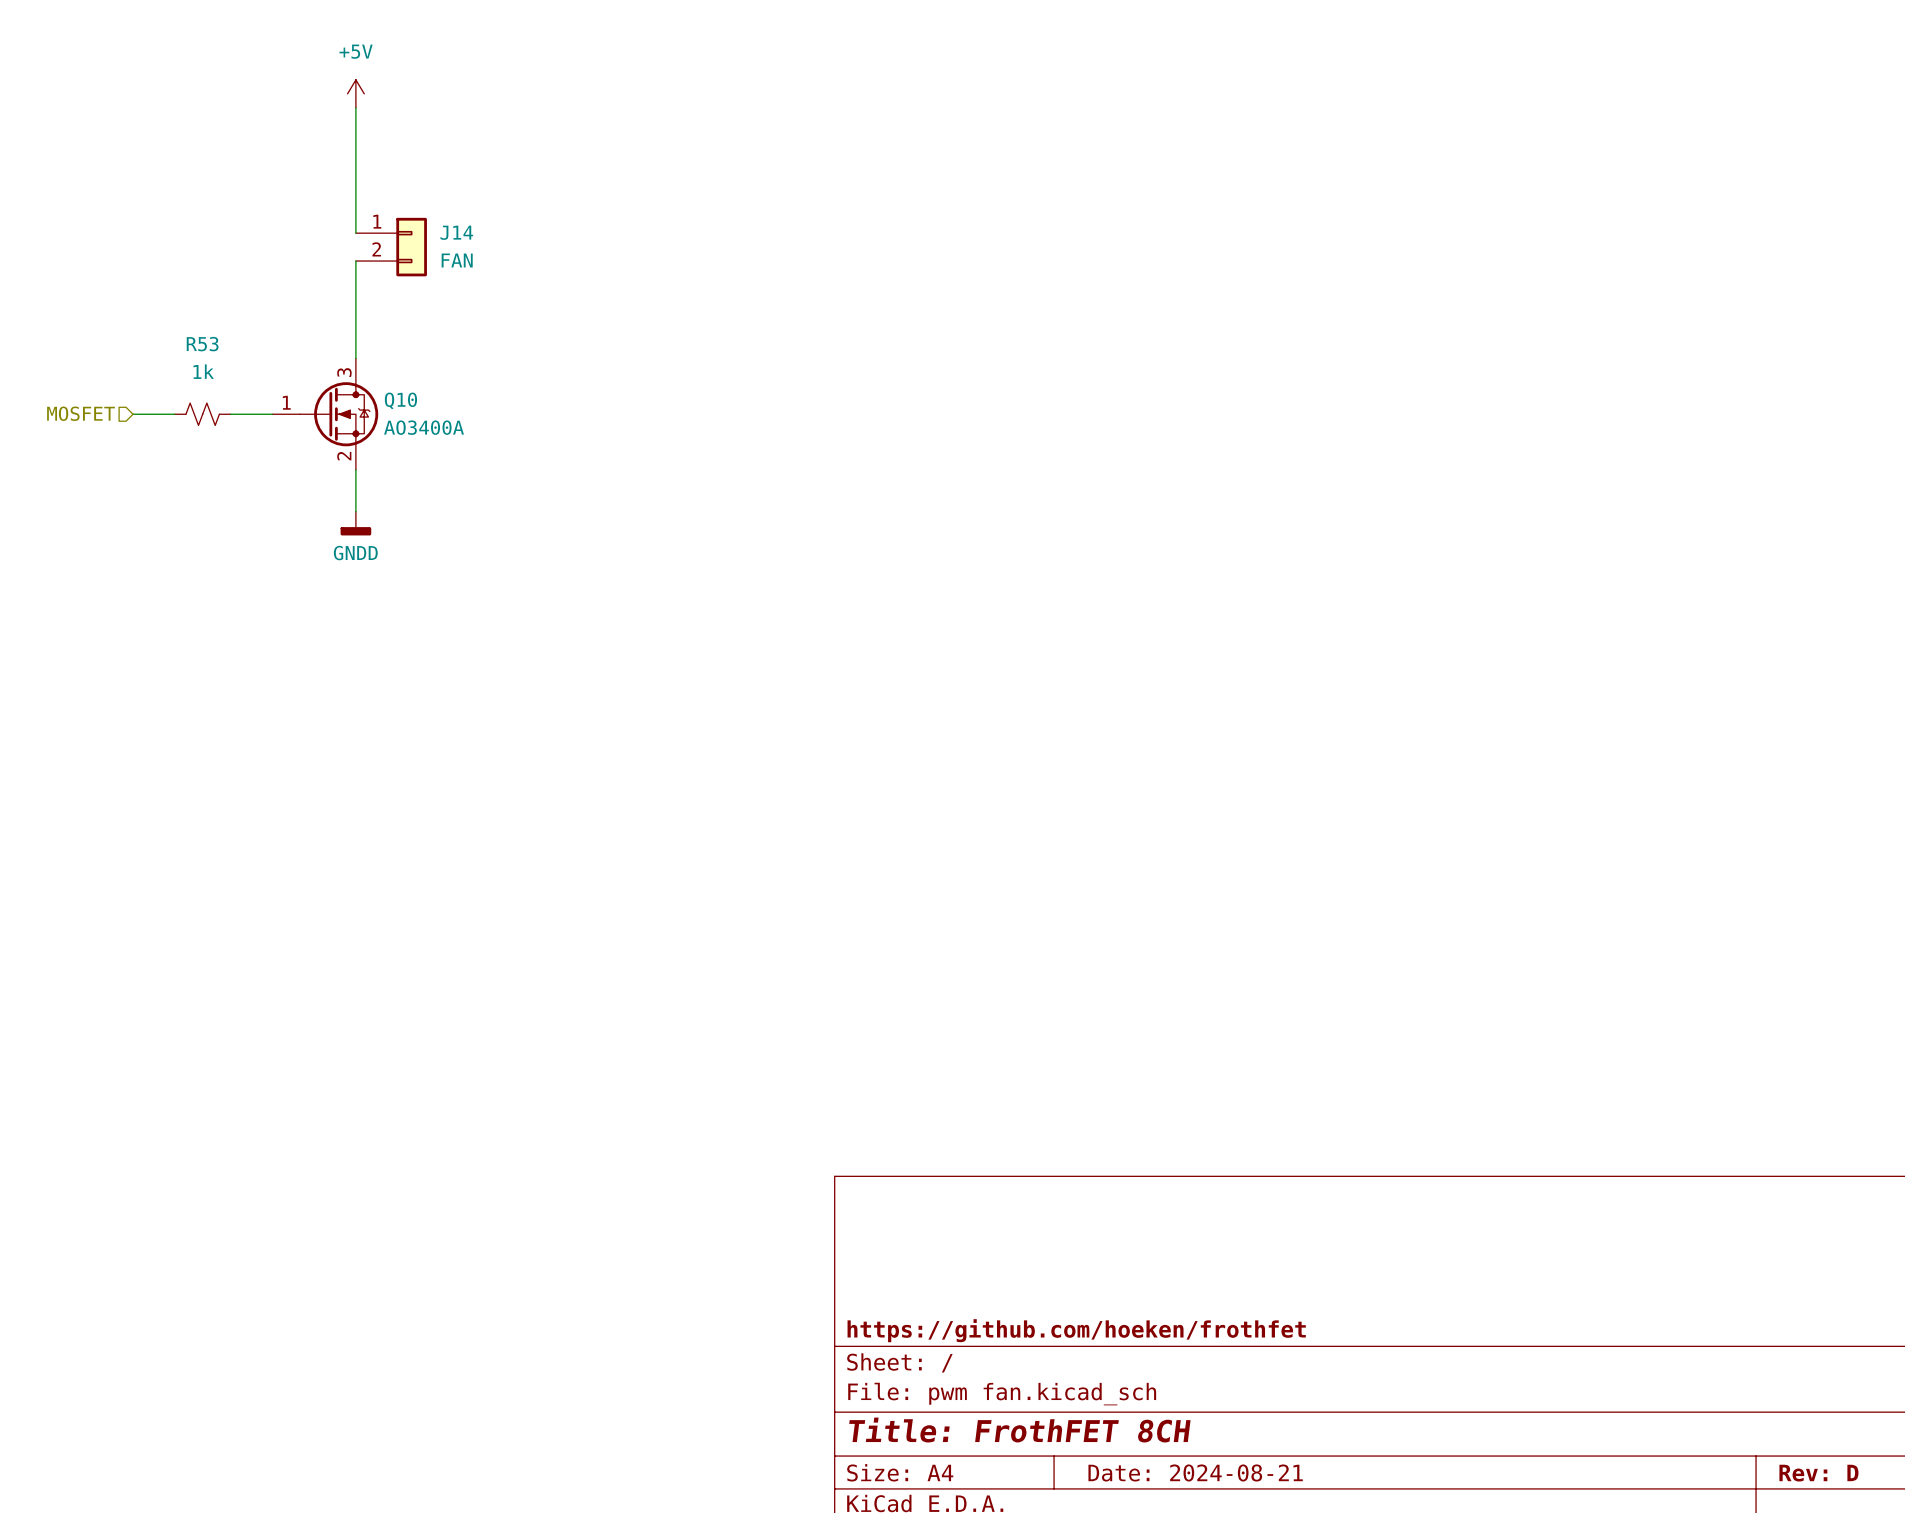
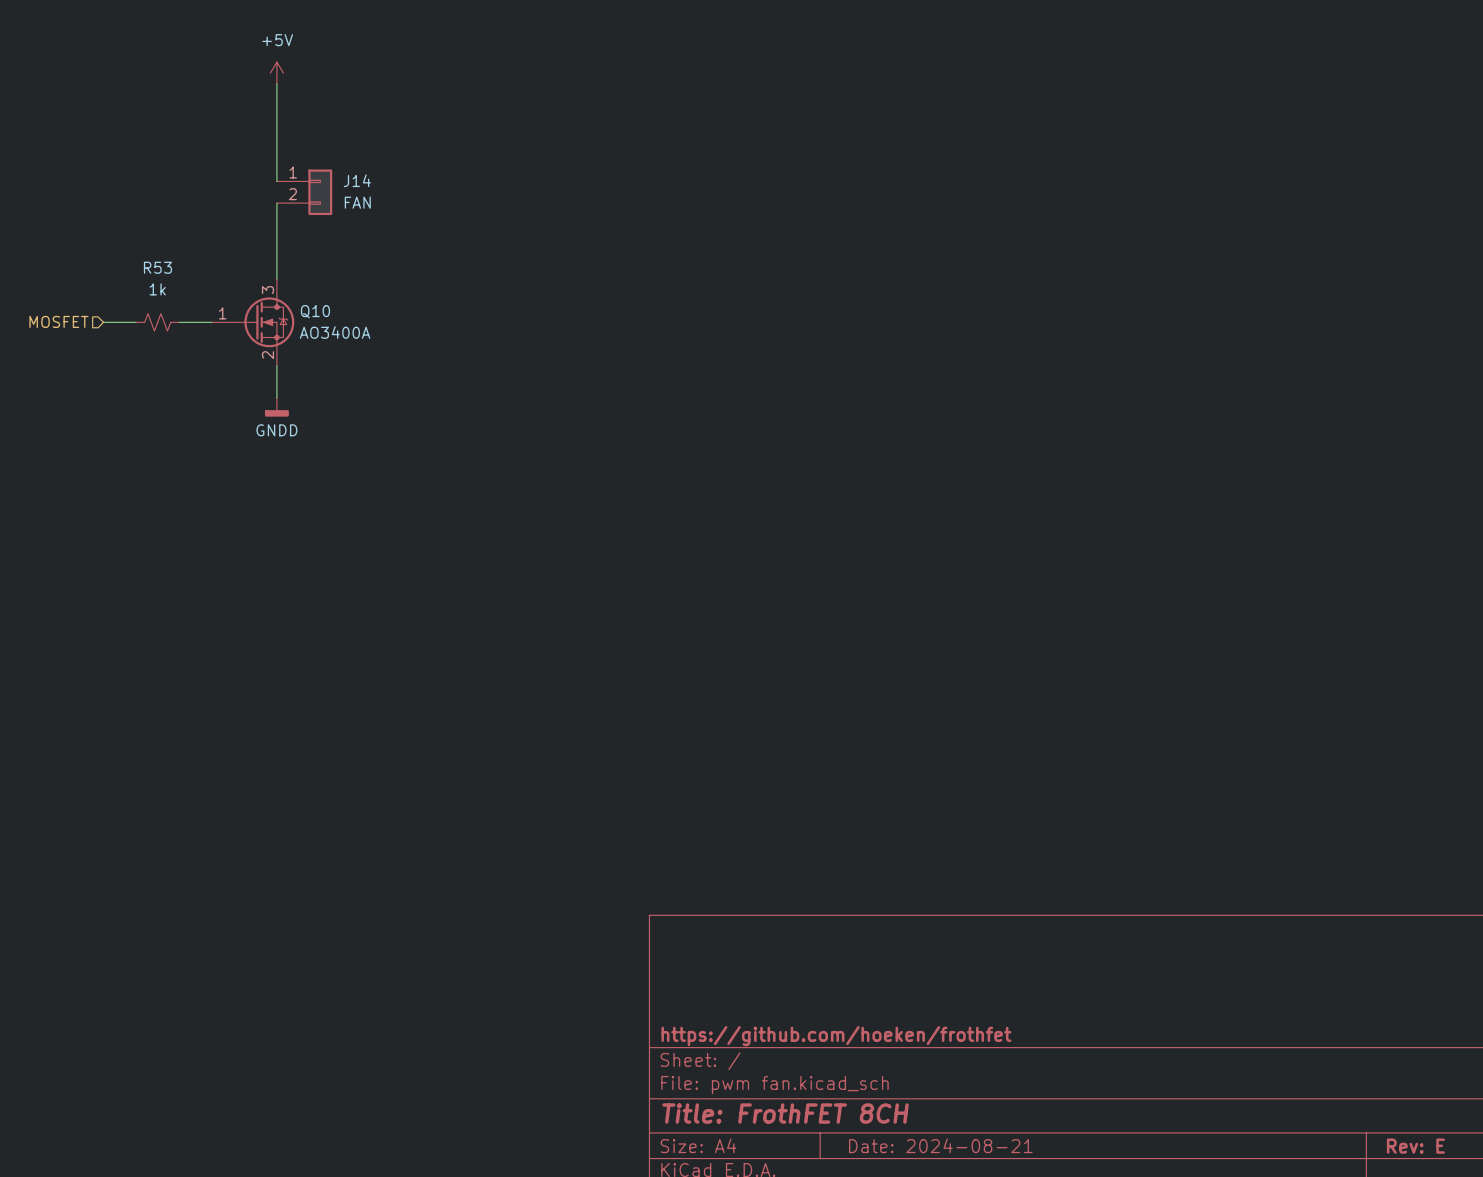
title block: Rev: D (1818, 1473) -> Rev: E (1415, 1146)

